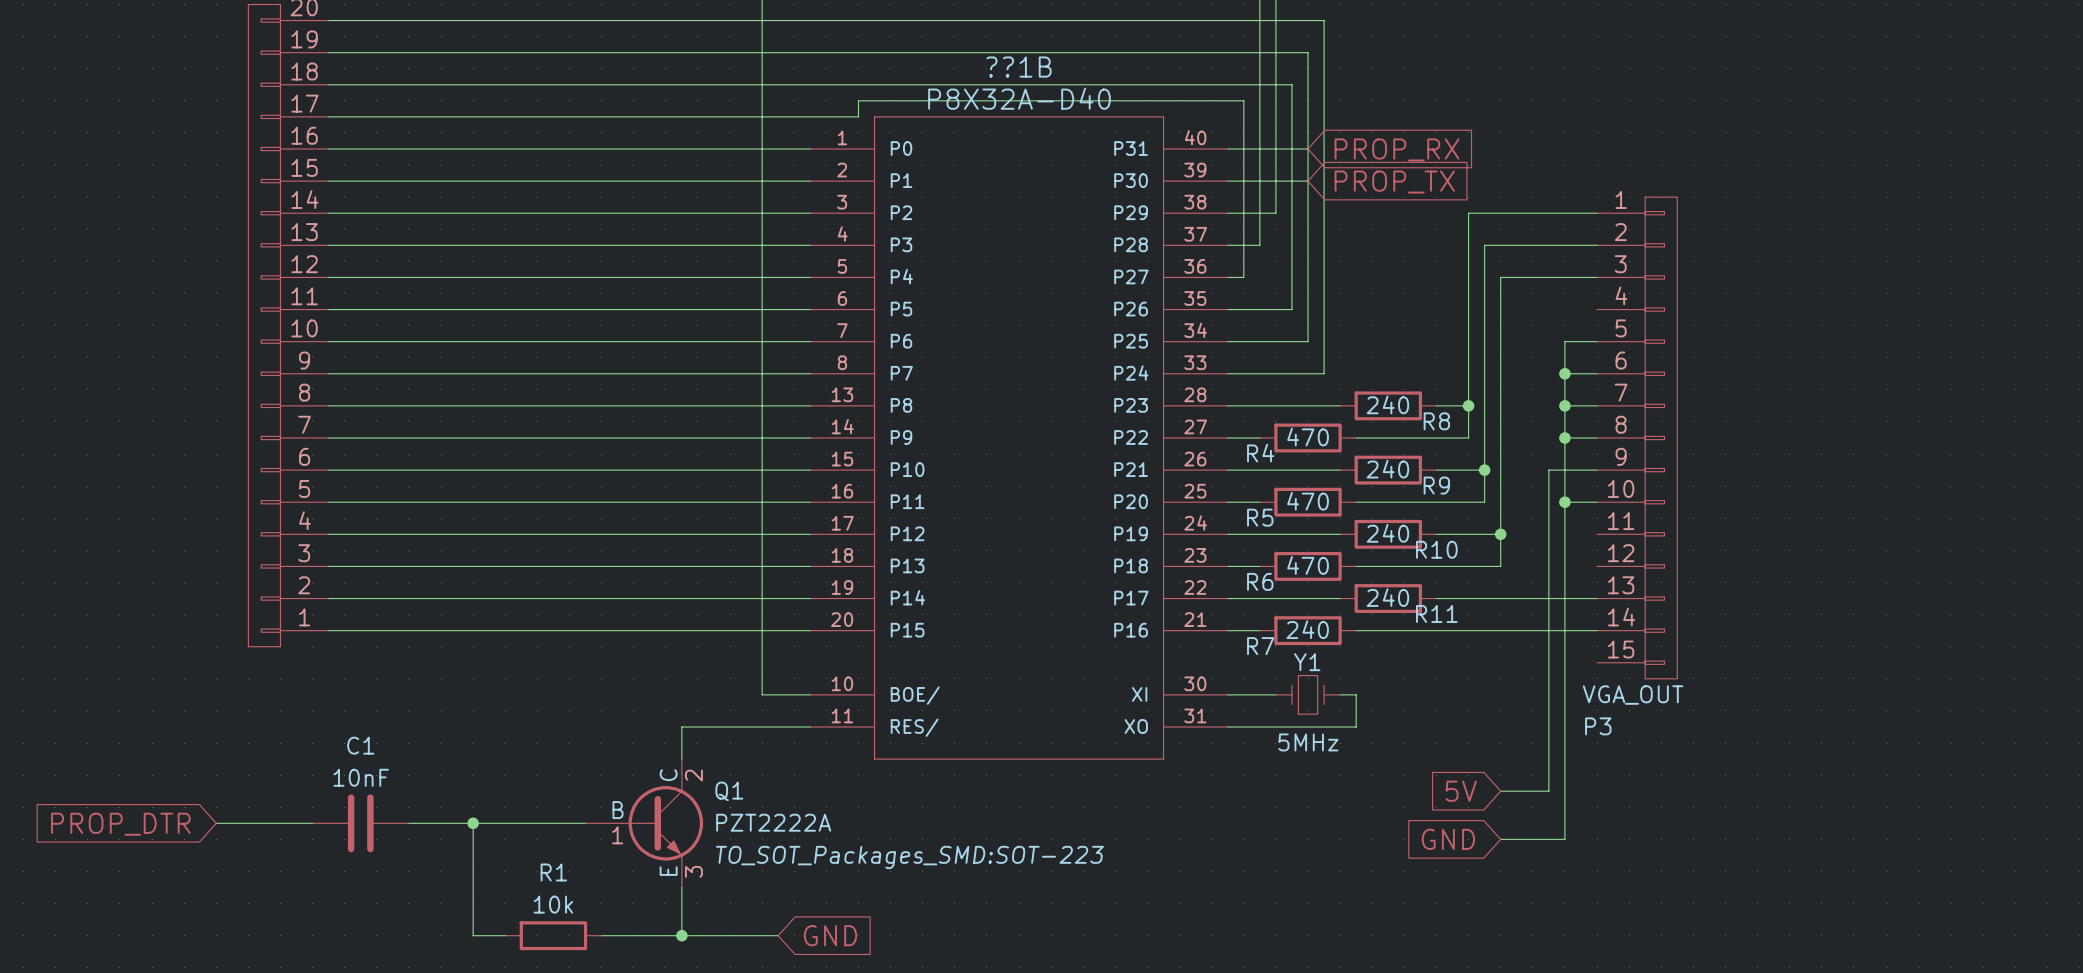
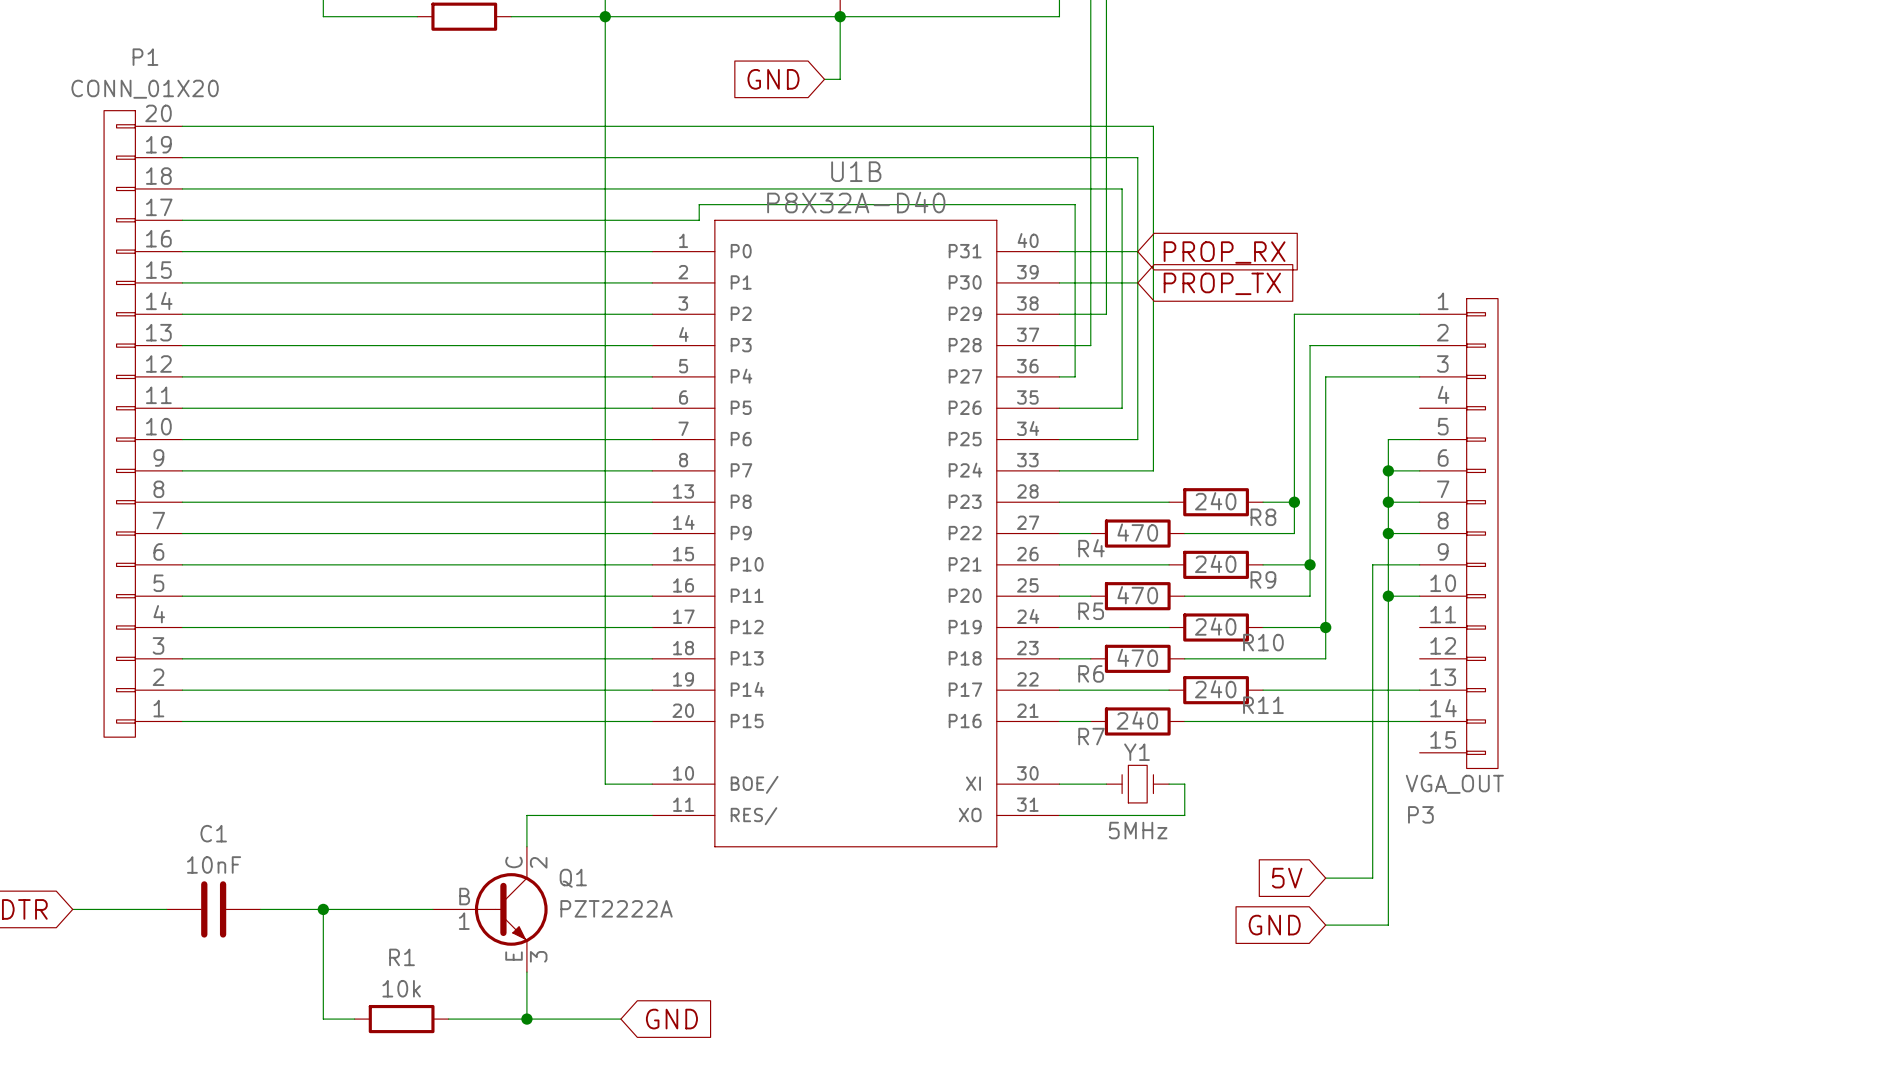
??1B name: ??1B (1019, 67) -> U1B (856, 171)
Q1 text: TO_SOT_Packages_SMD:SOT-223 (909, 857) -> none

